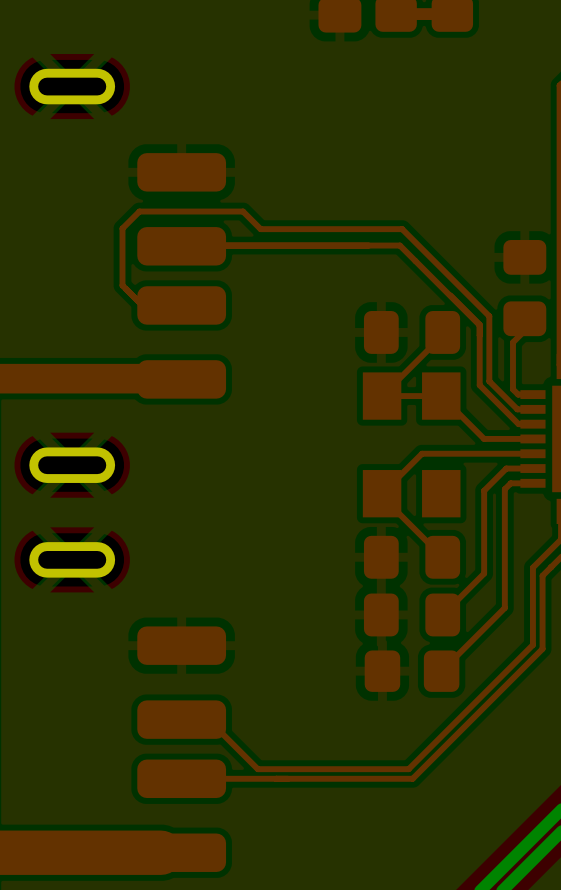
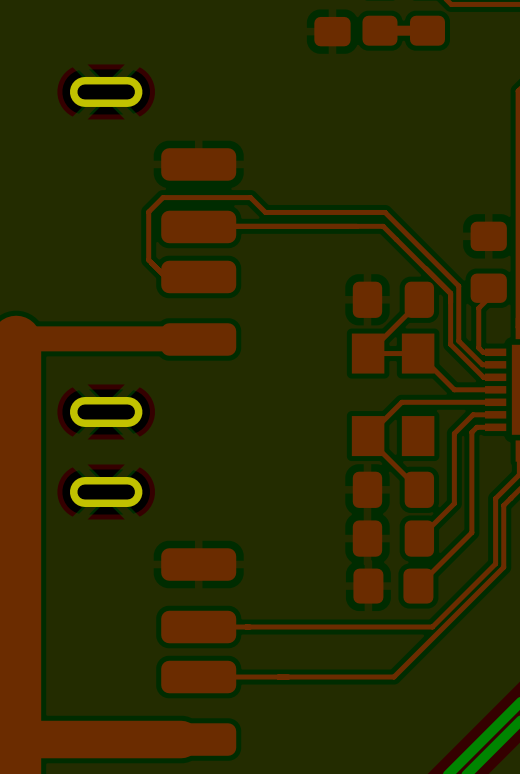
top track: (458, 719) (408, 769) (257, 769) (208, 719) -> (432, 627) (221, 627)

